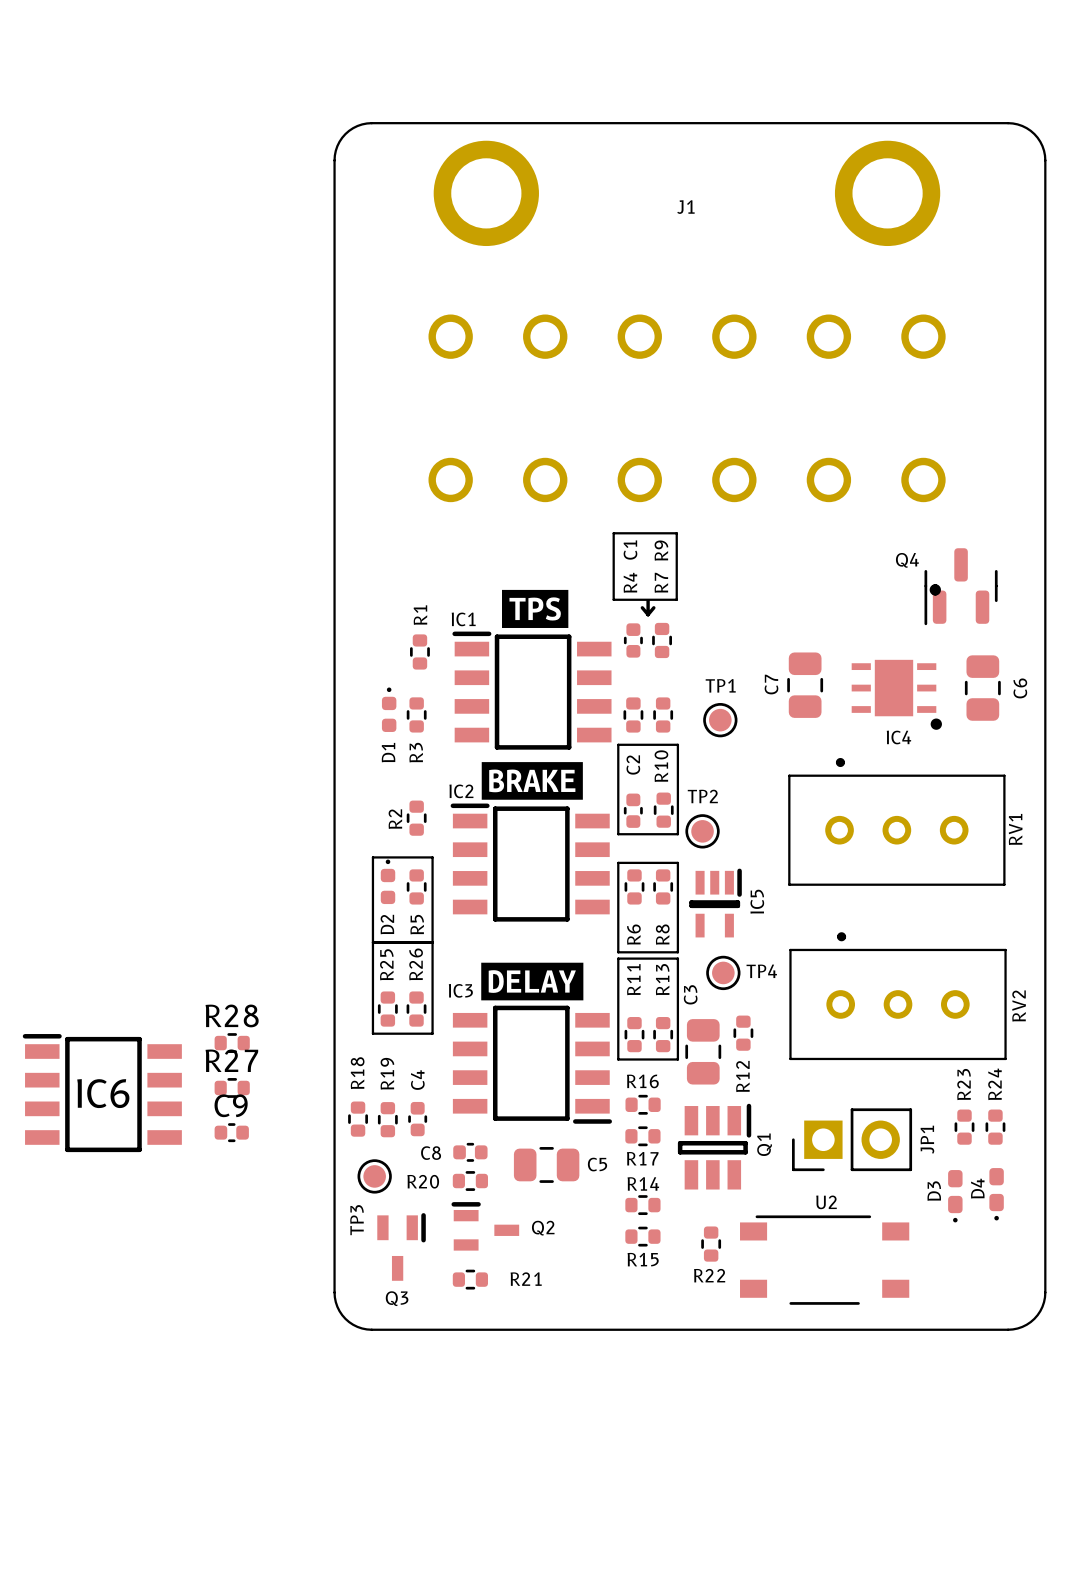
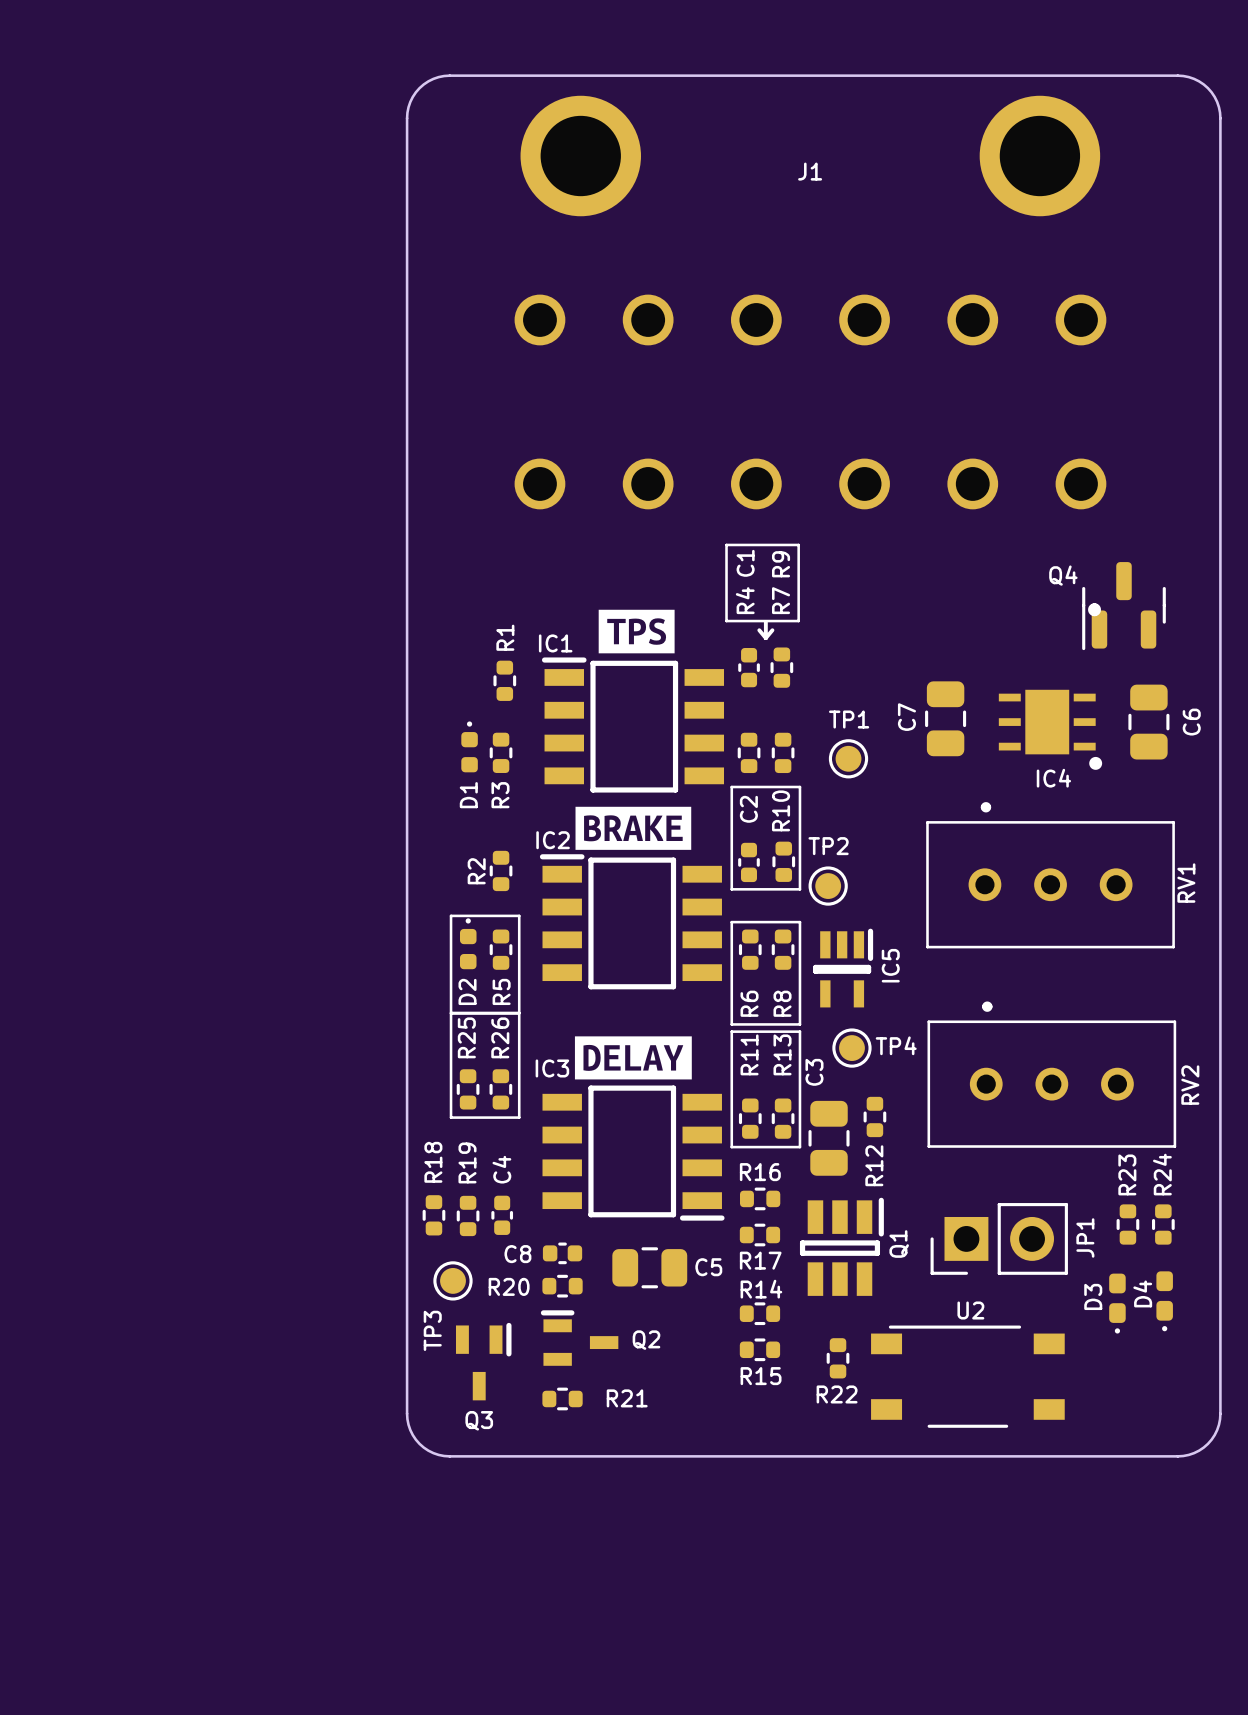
R28: (232, 1043) -> none
R27: (232, 1087) -> none
IC6: (102, 1093) -> none
C9: (231, 1132) -> none

